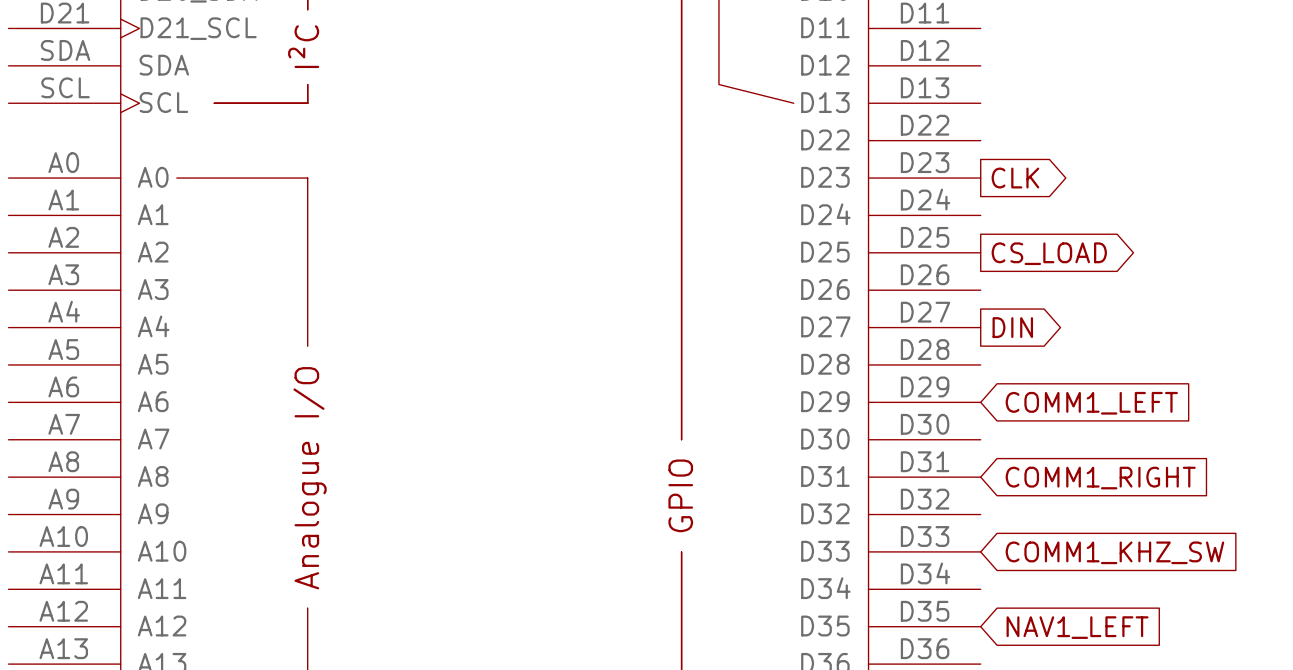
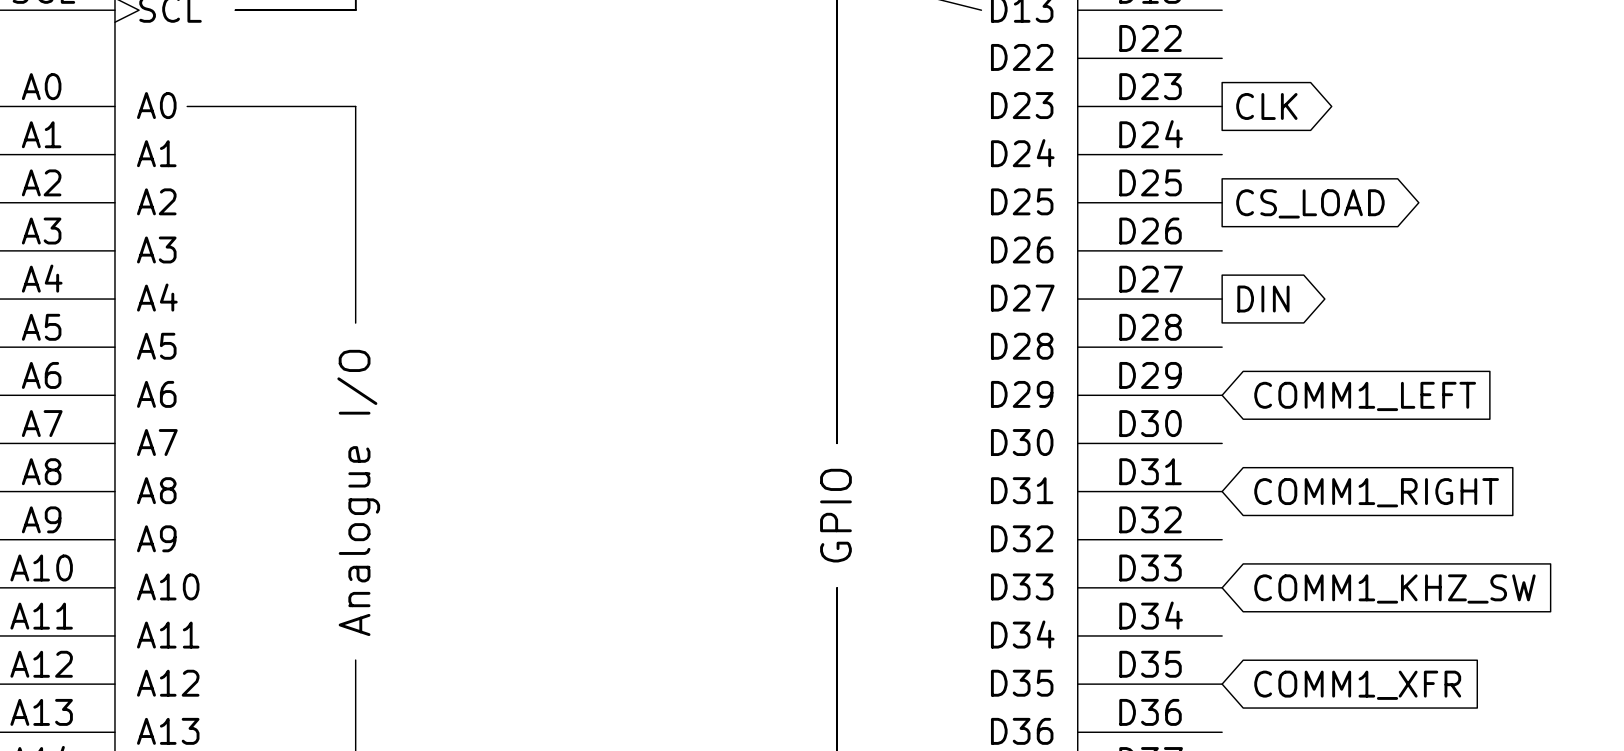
global label: NAV1_LEFT (1077, 627) -> COMM1_XFR (1357, 685)

